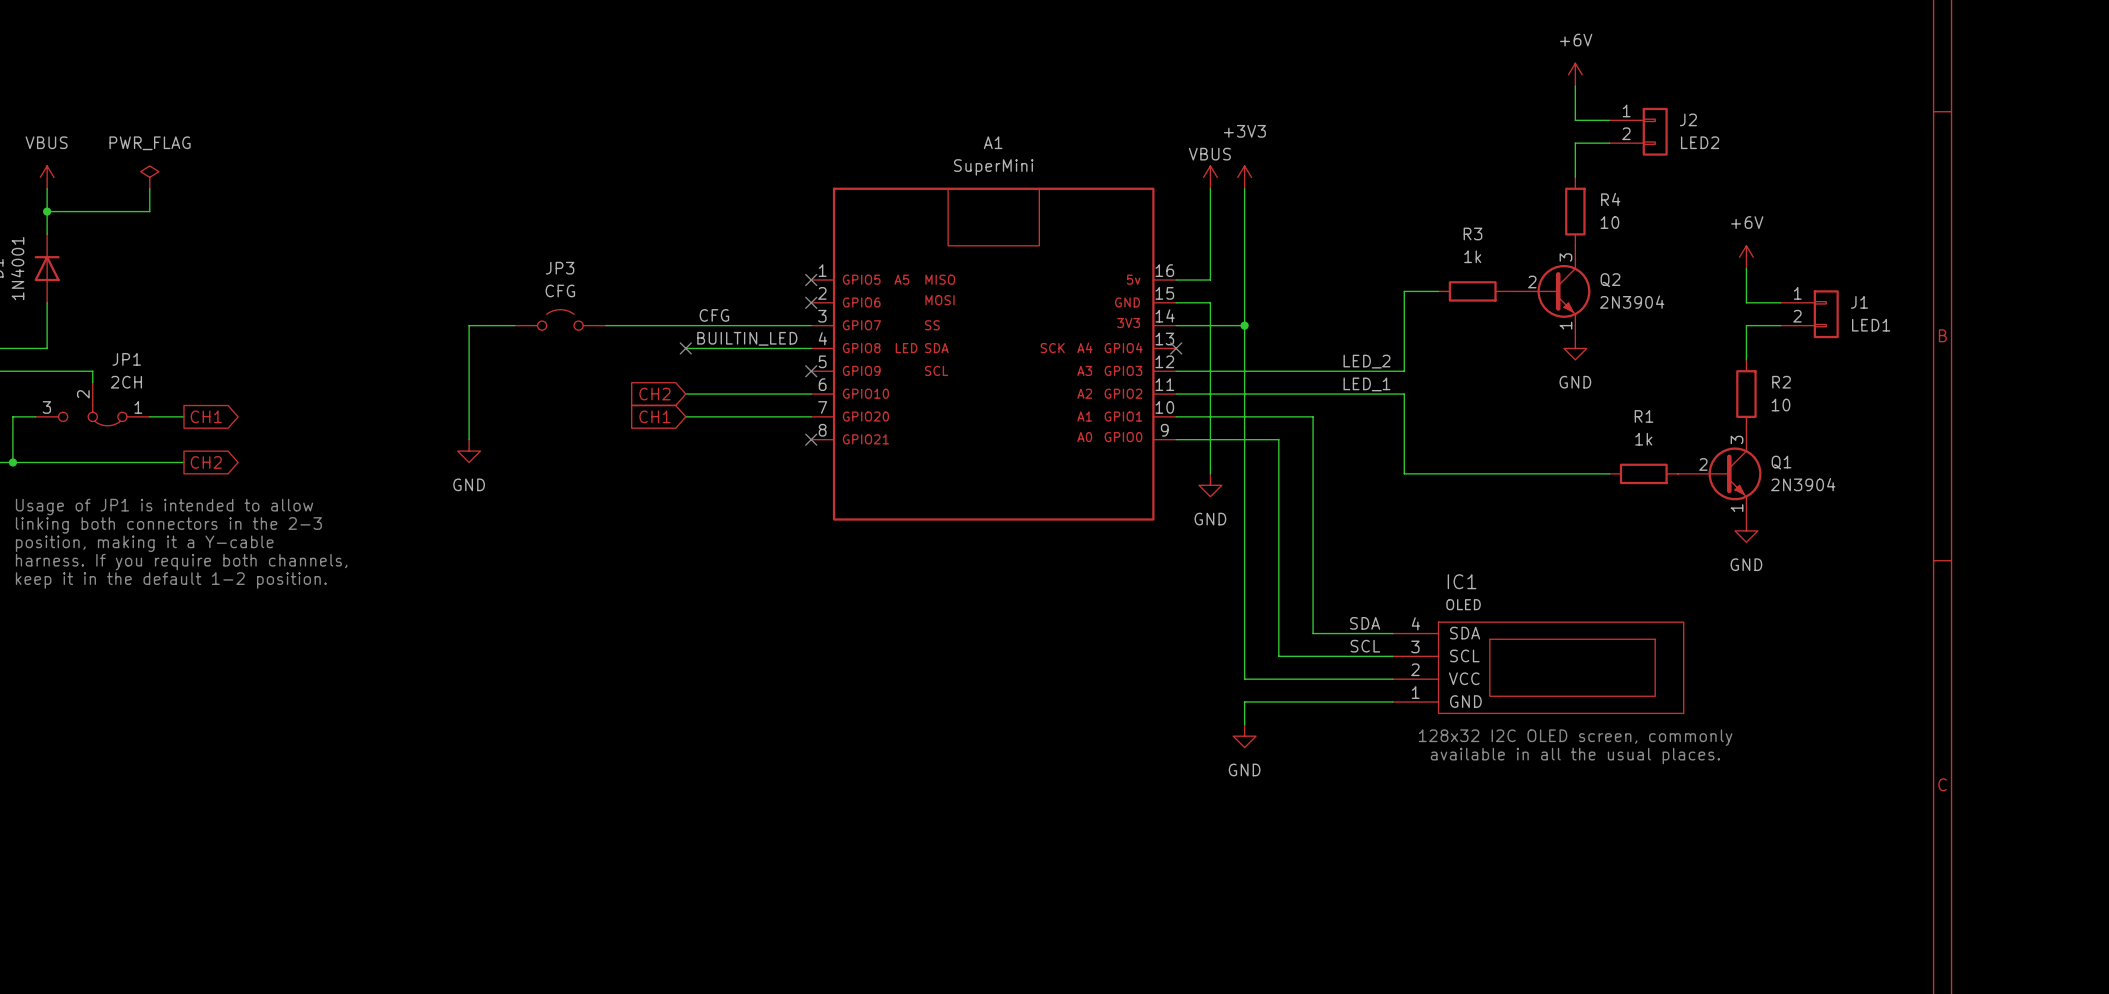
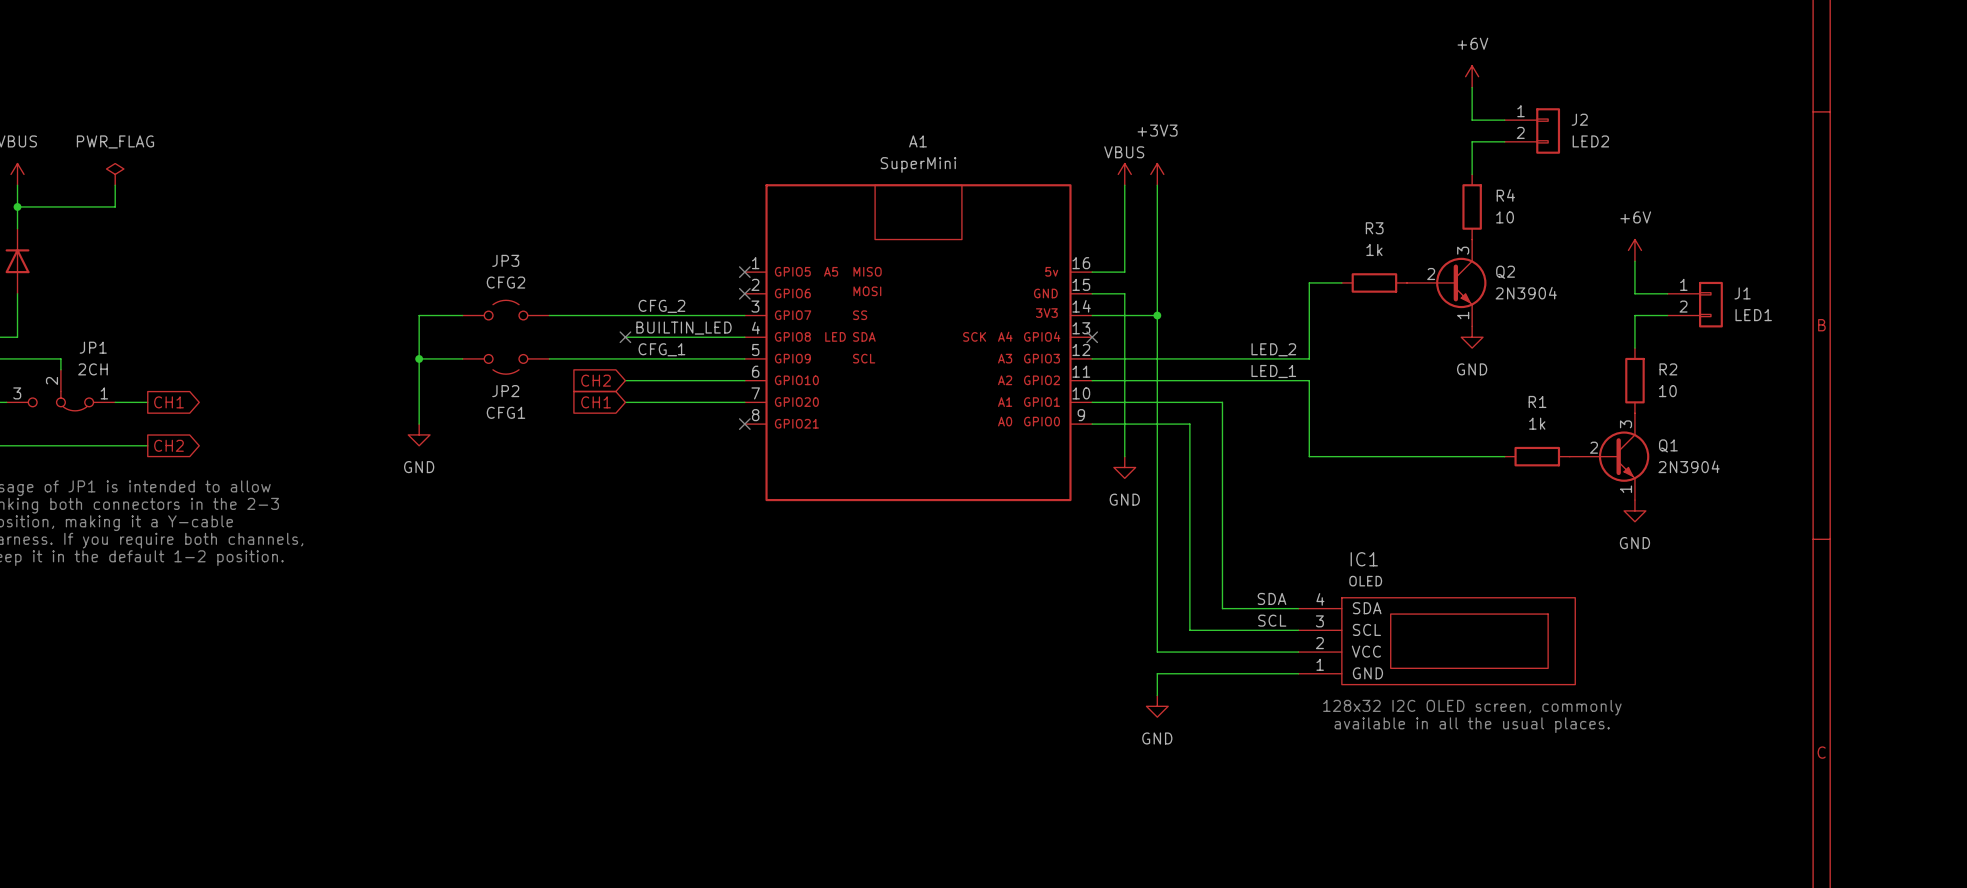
JP3 value: CFG (560, 290) -> CFG2 (506, 282)
label: CFG (714, 315) -> CFG_2 (661, 306)
label: none -> CFG_1 (661, 349)
wire: none -> (419, 358) (462, 358)
junction: none -> (419, 358)
wire: none -> (549, 358) (744, 358)
no-connect mark: (811, 371) -> none
JP2: none -> CFG1 (506, 364)

